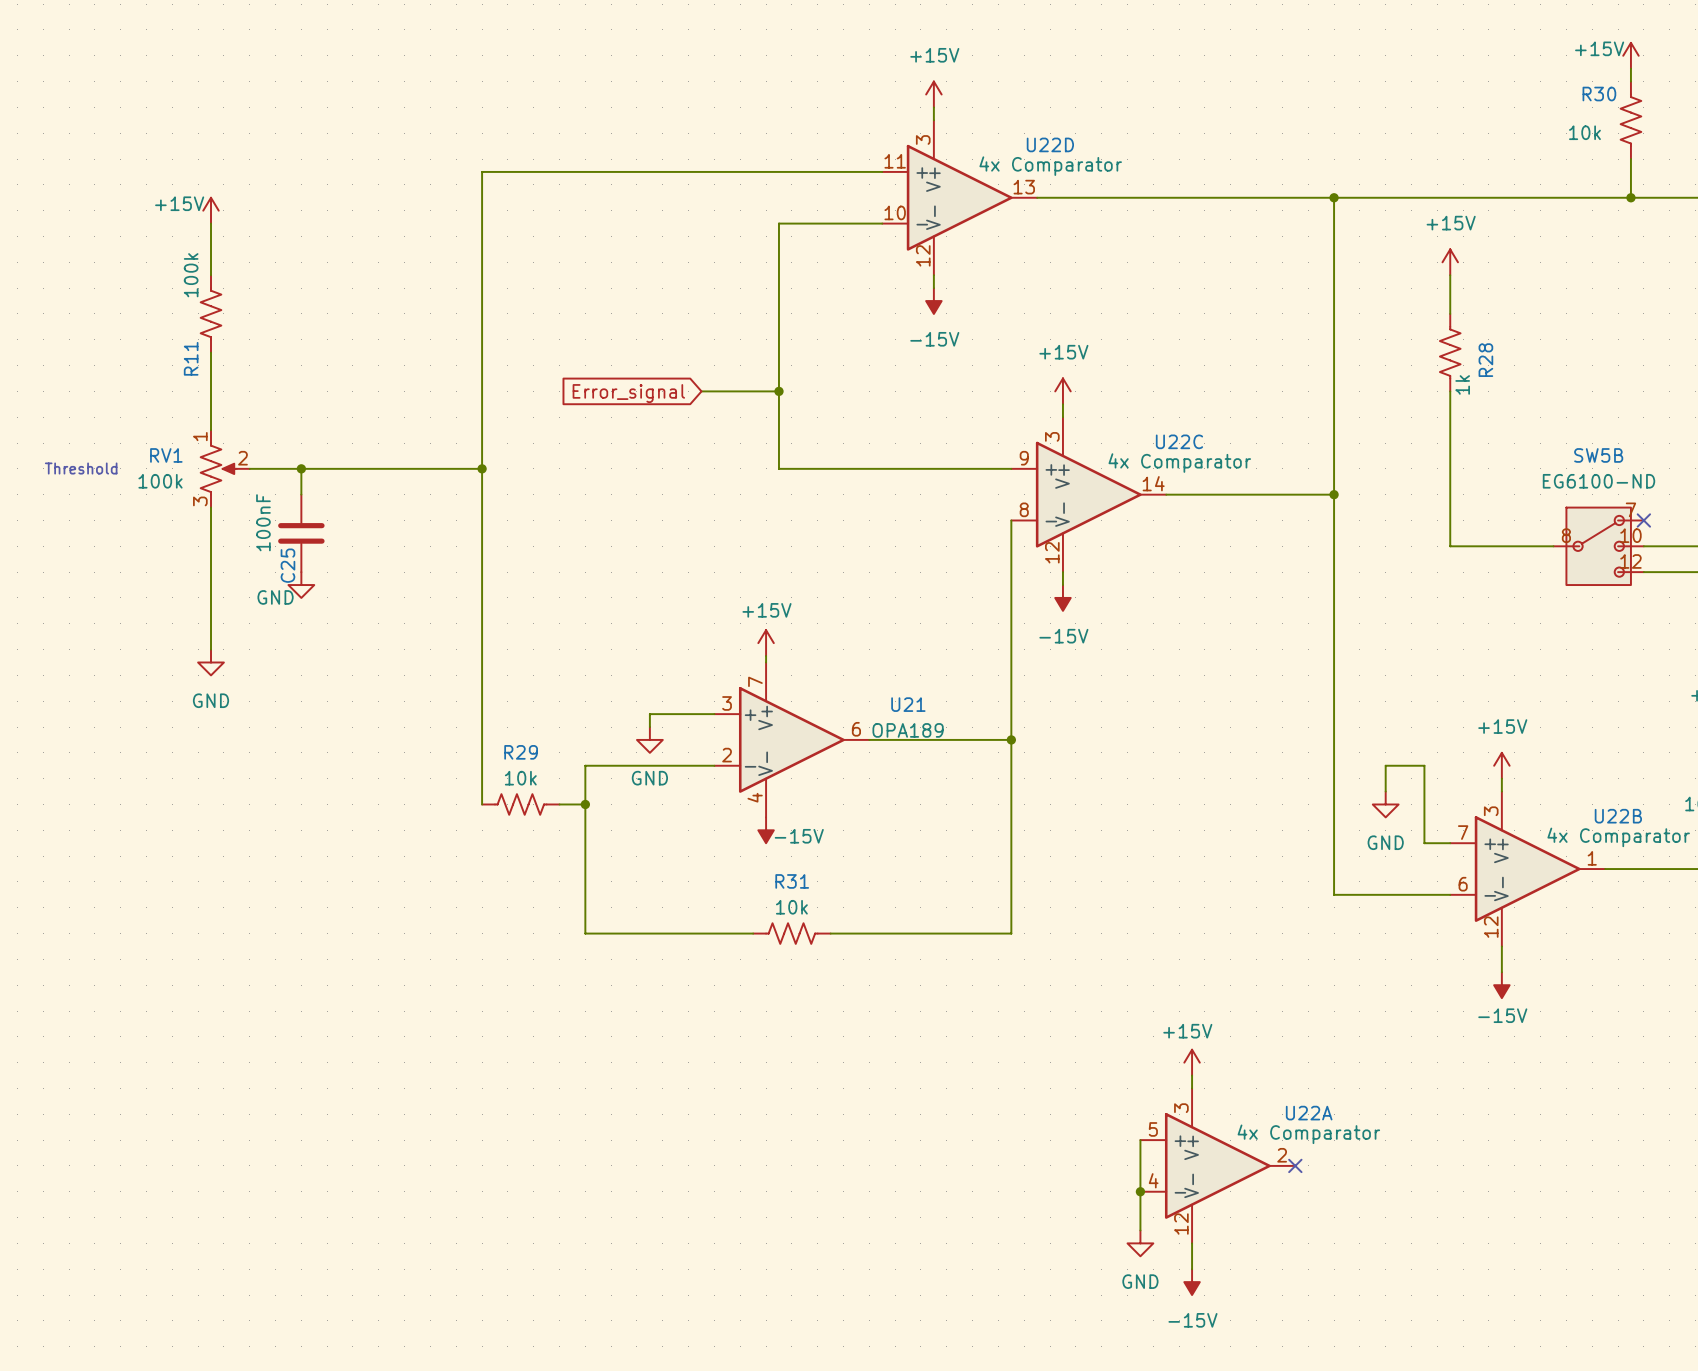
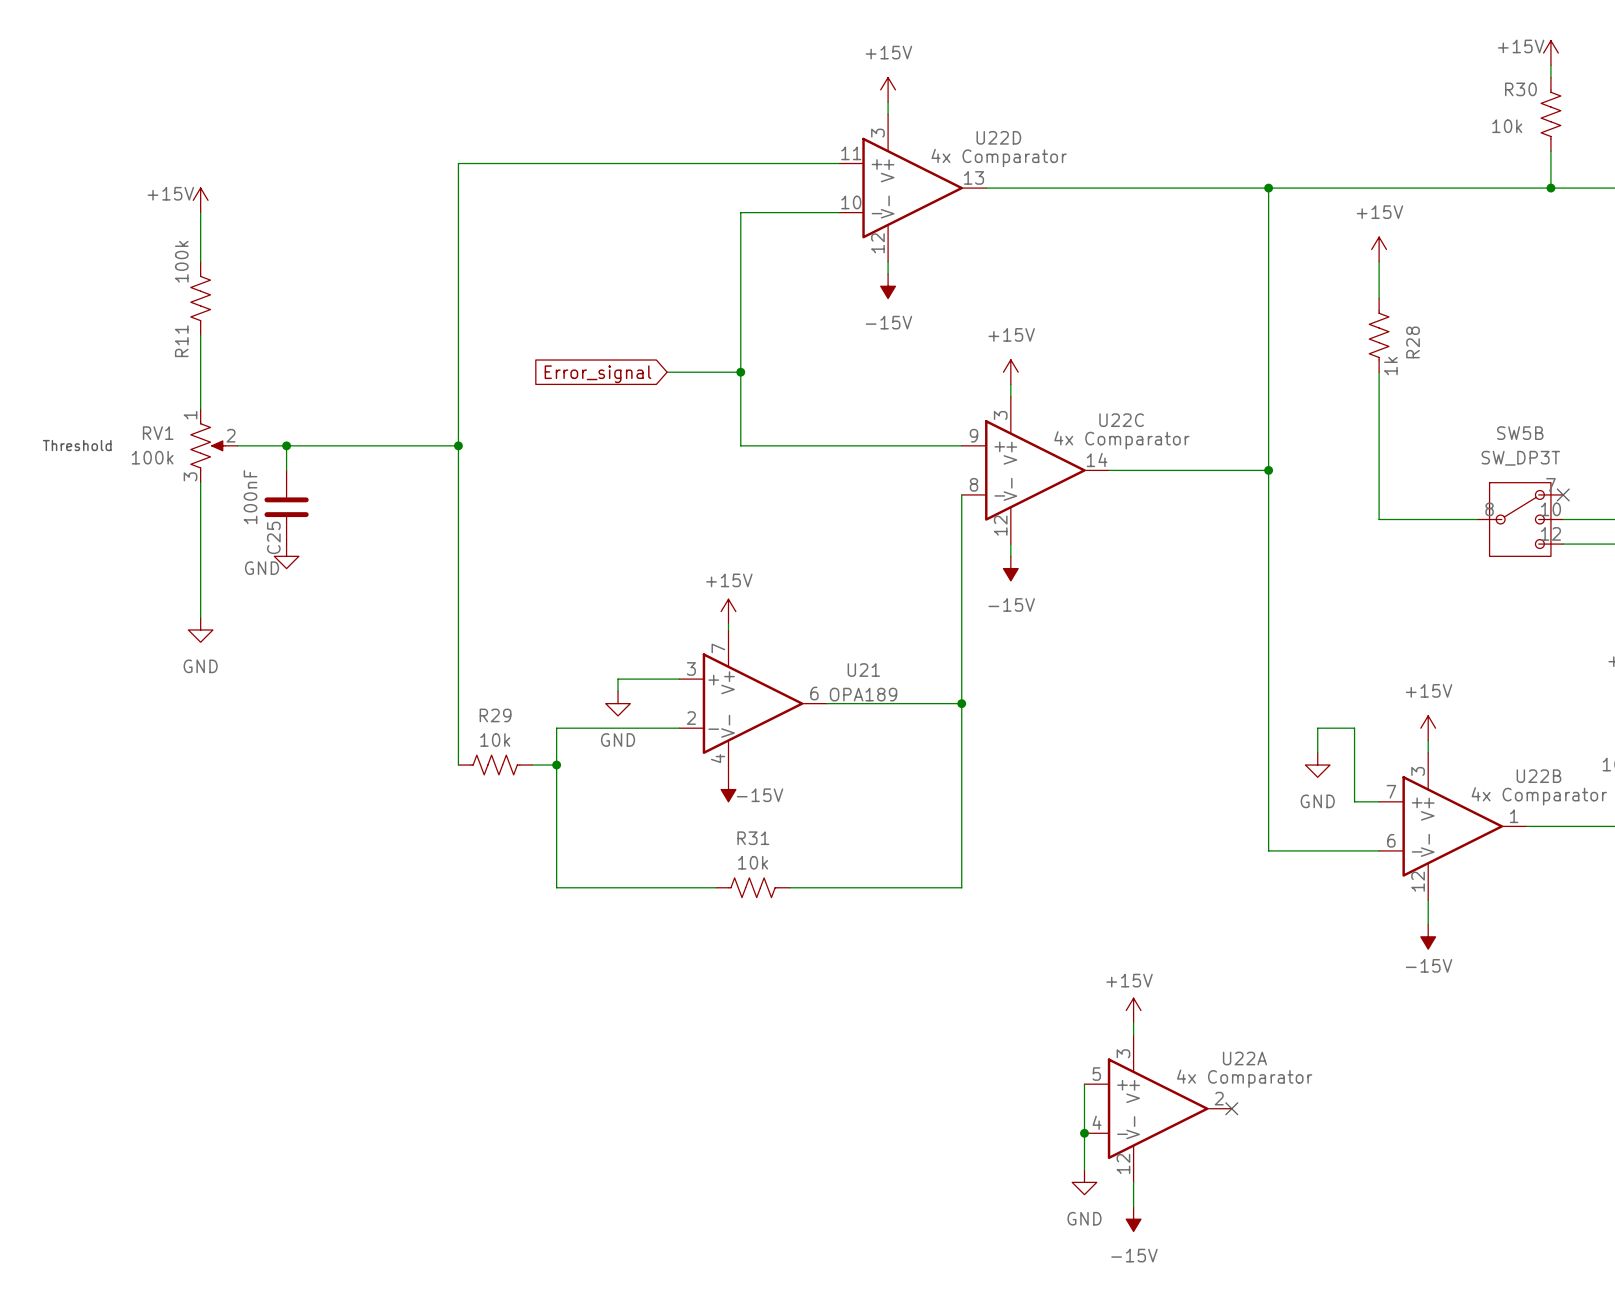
SW5B value: EG6100-ND (1598, 481) -> SW_DP3T (1520, 458)

